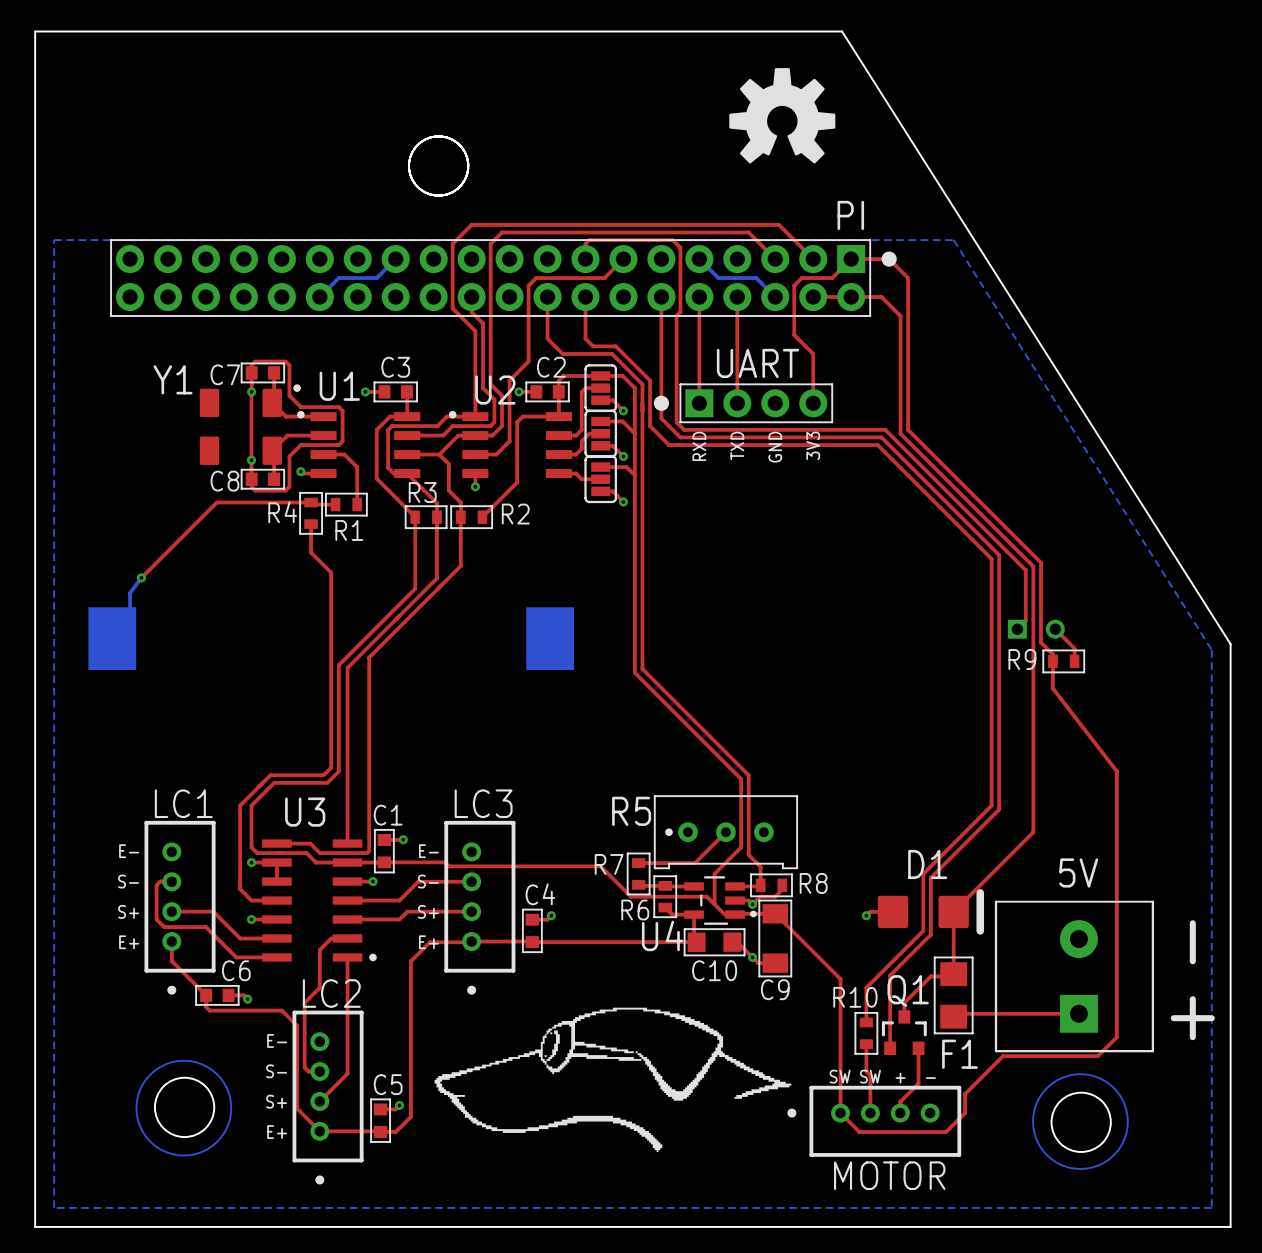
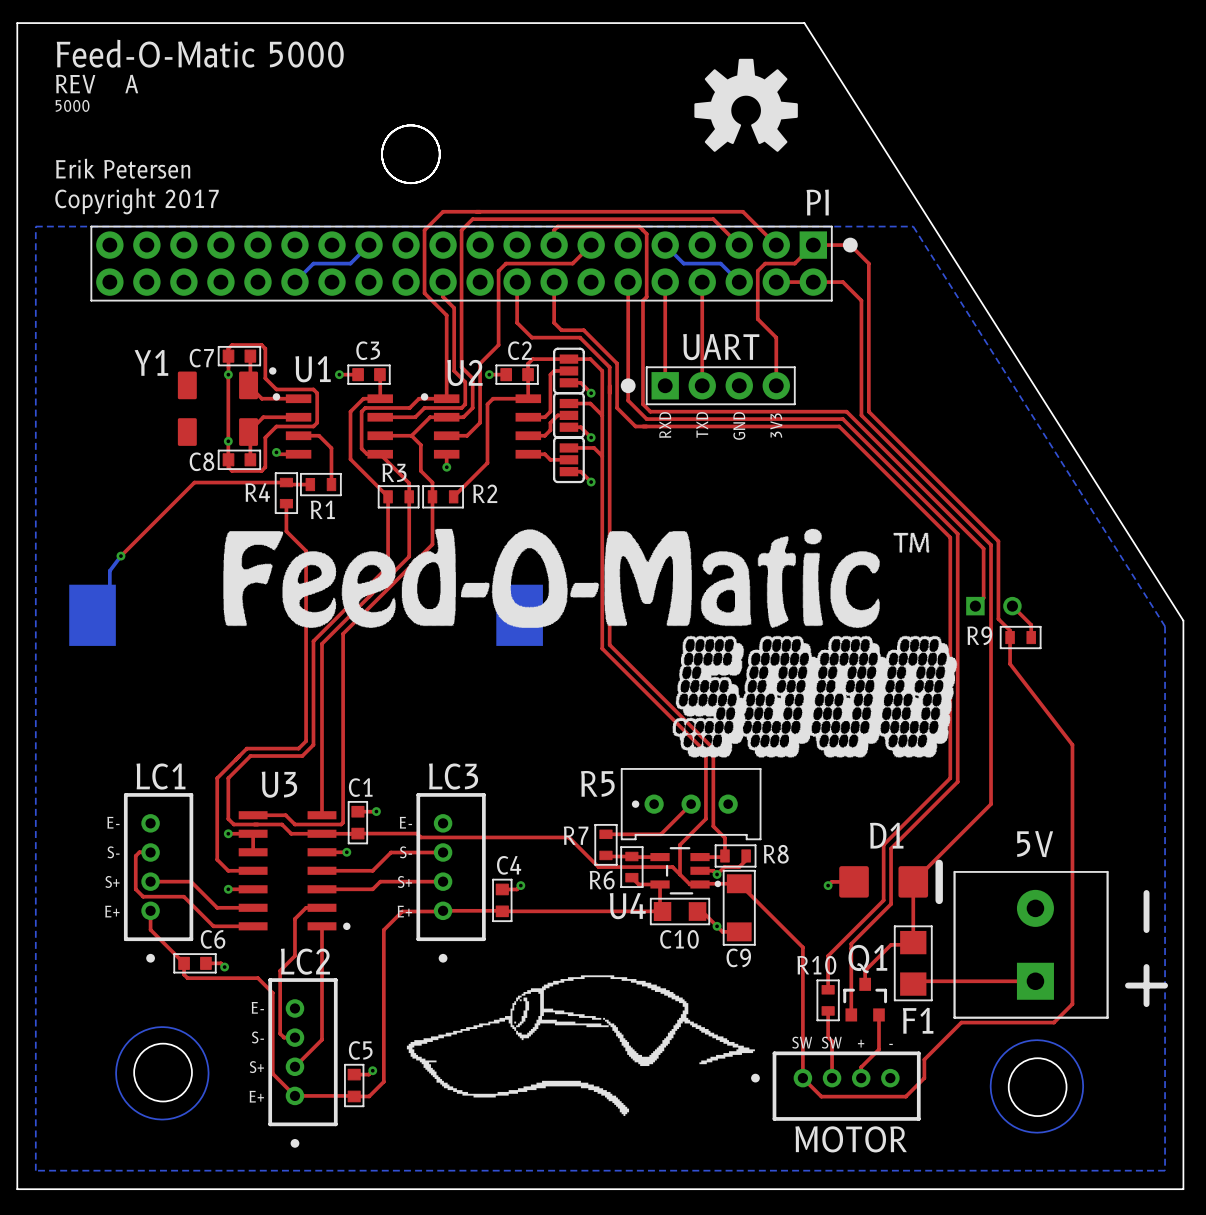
text: none -> Feed-O-Matic 5000 (200, 53)
text: none -> REV (75, 84)
text: none -> A (131, 84)
text: none -> 5000 (72, 105)
text: none -> Erik Petersen (123, 168)
text: none -> Copyright 2017 (137, 201)
drawing: none -> [223, 528, 958, 758]
drawing: none -> [893, 532, 930, 553]

